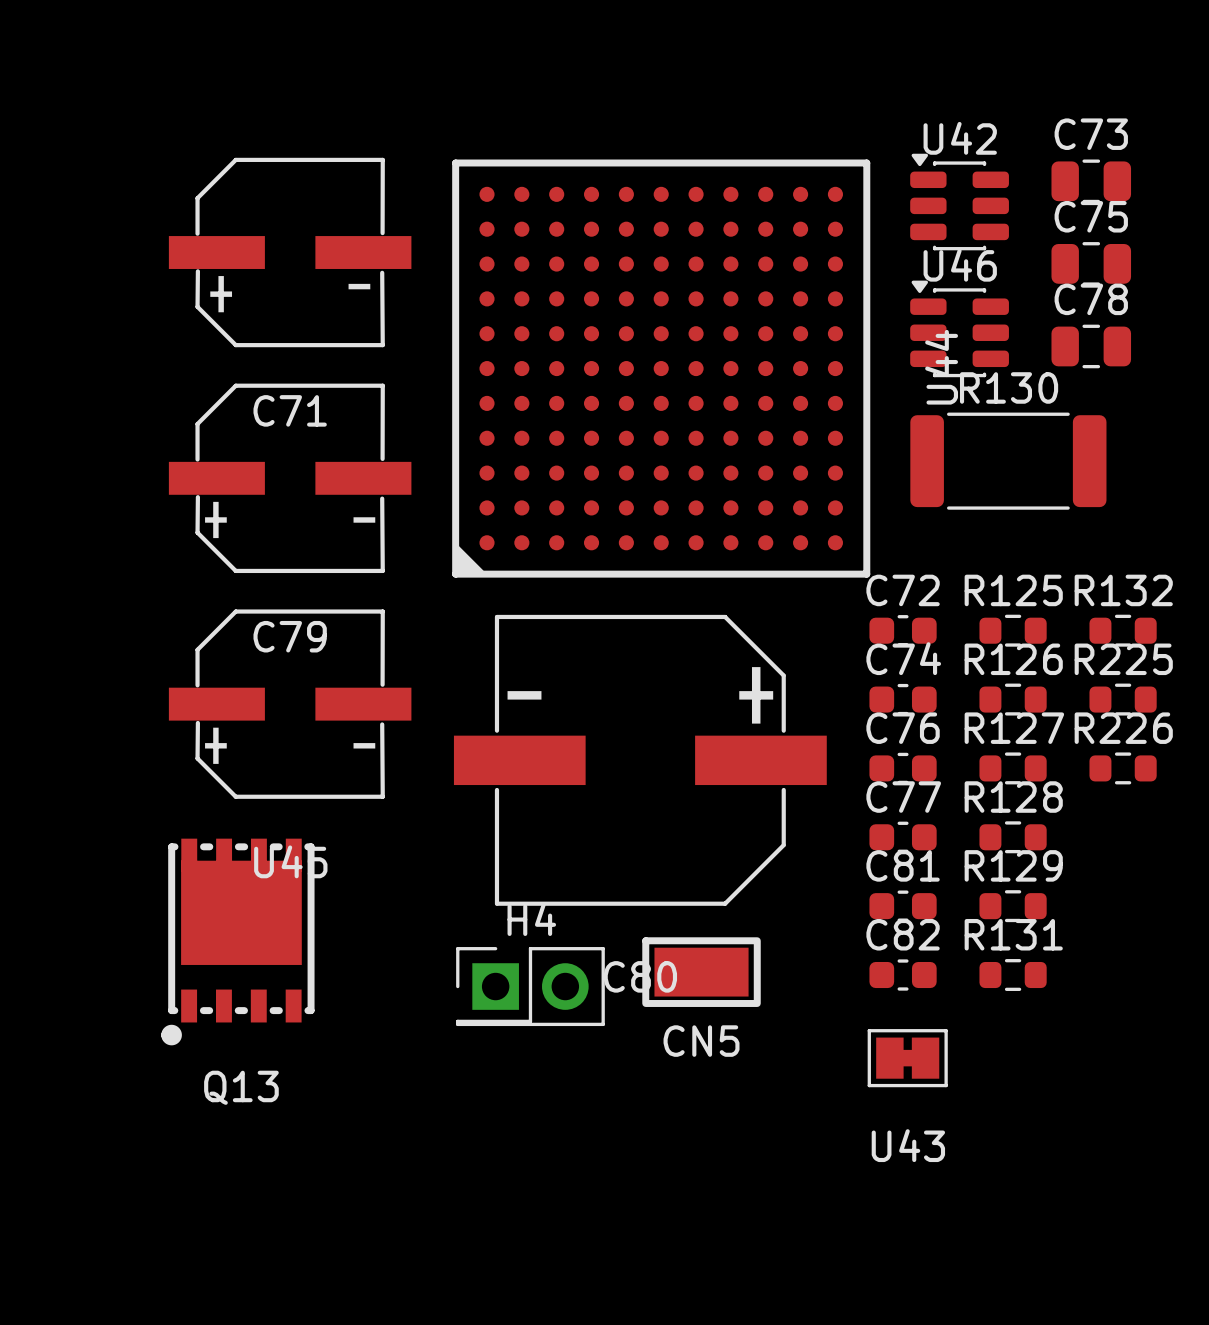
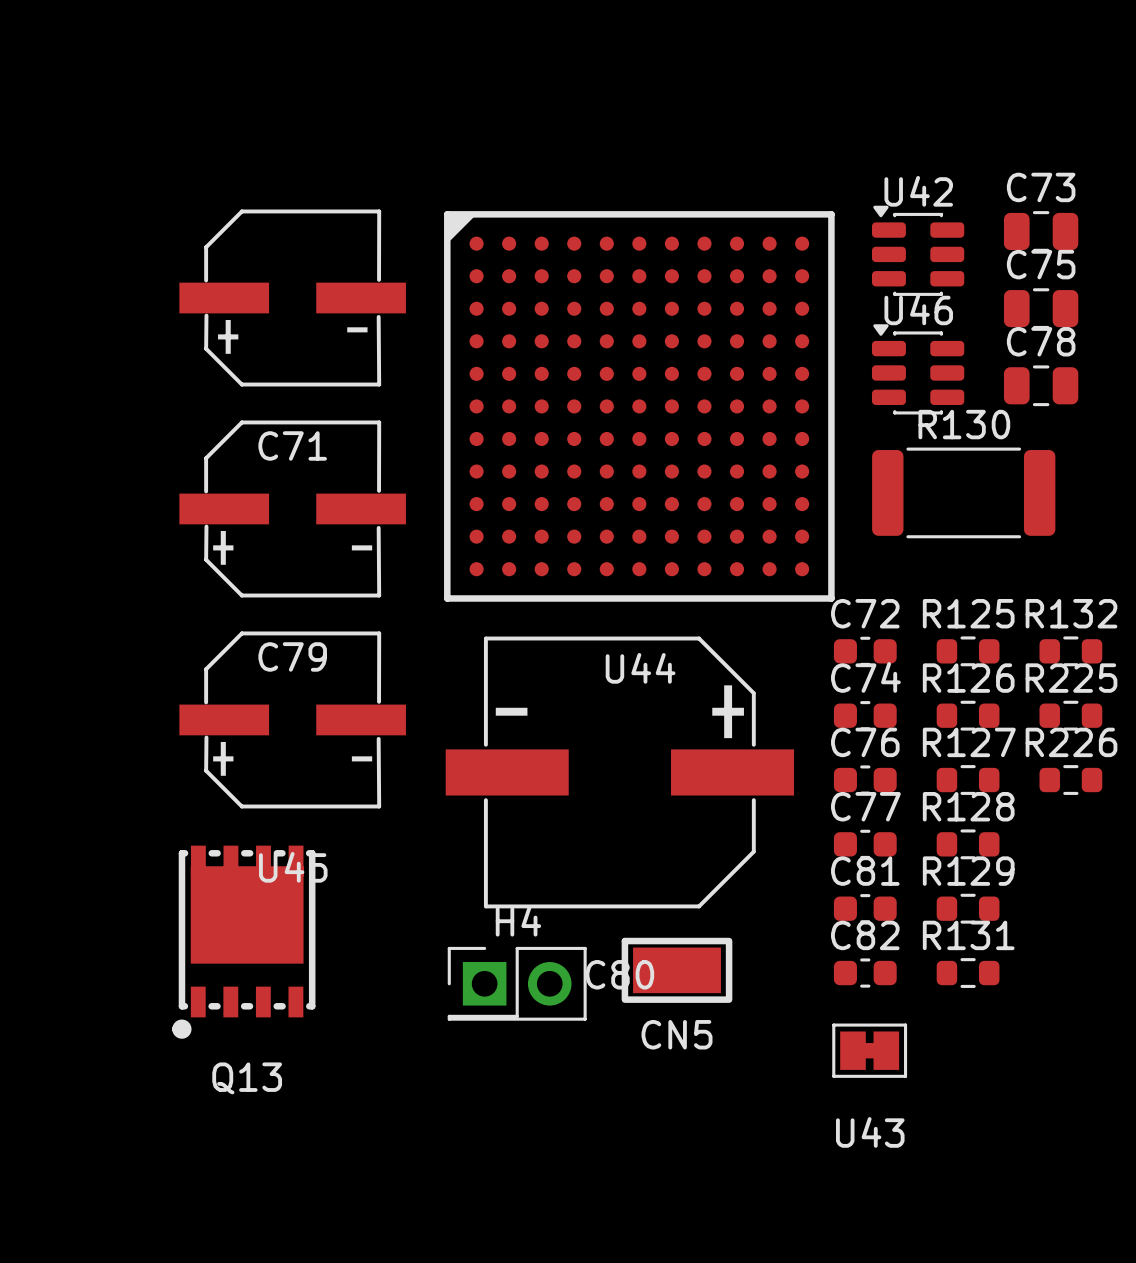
U44 rotation: 0° (661, 368) -> 90° clockwise (639, 406)

